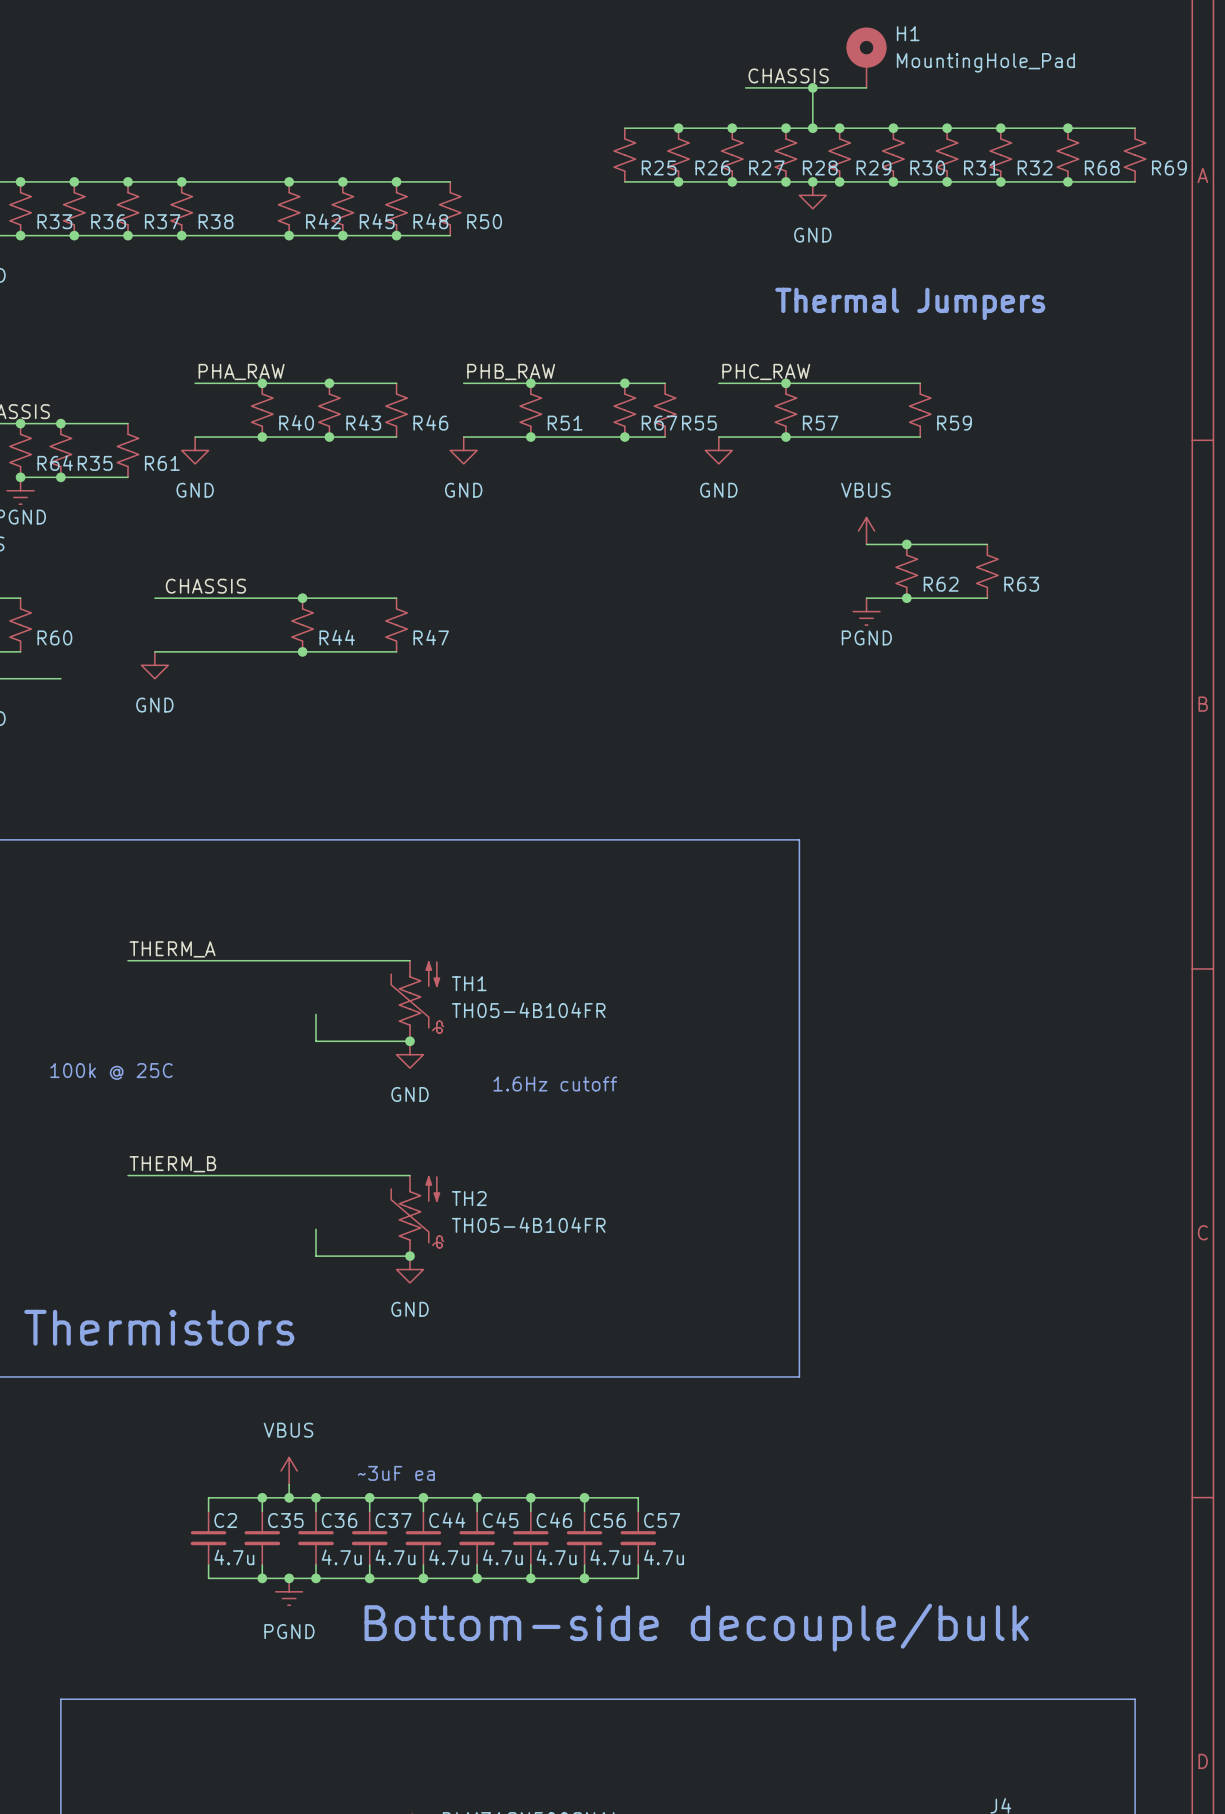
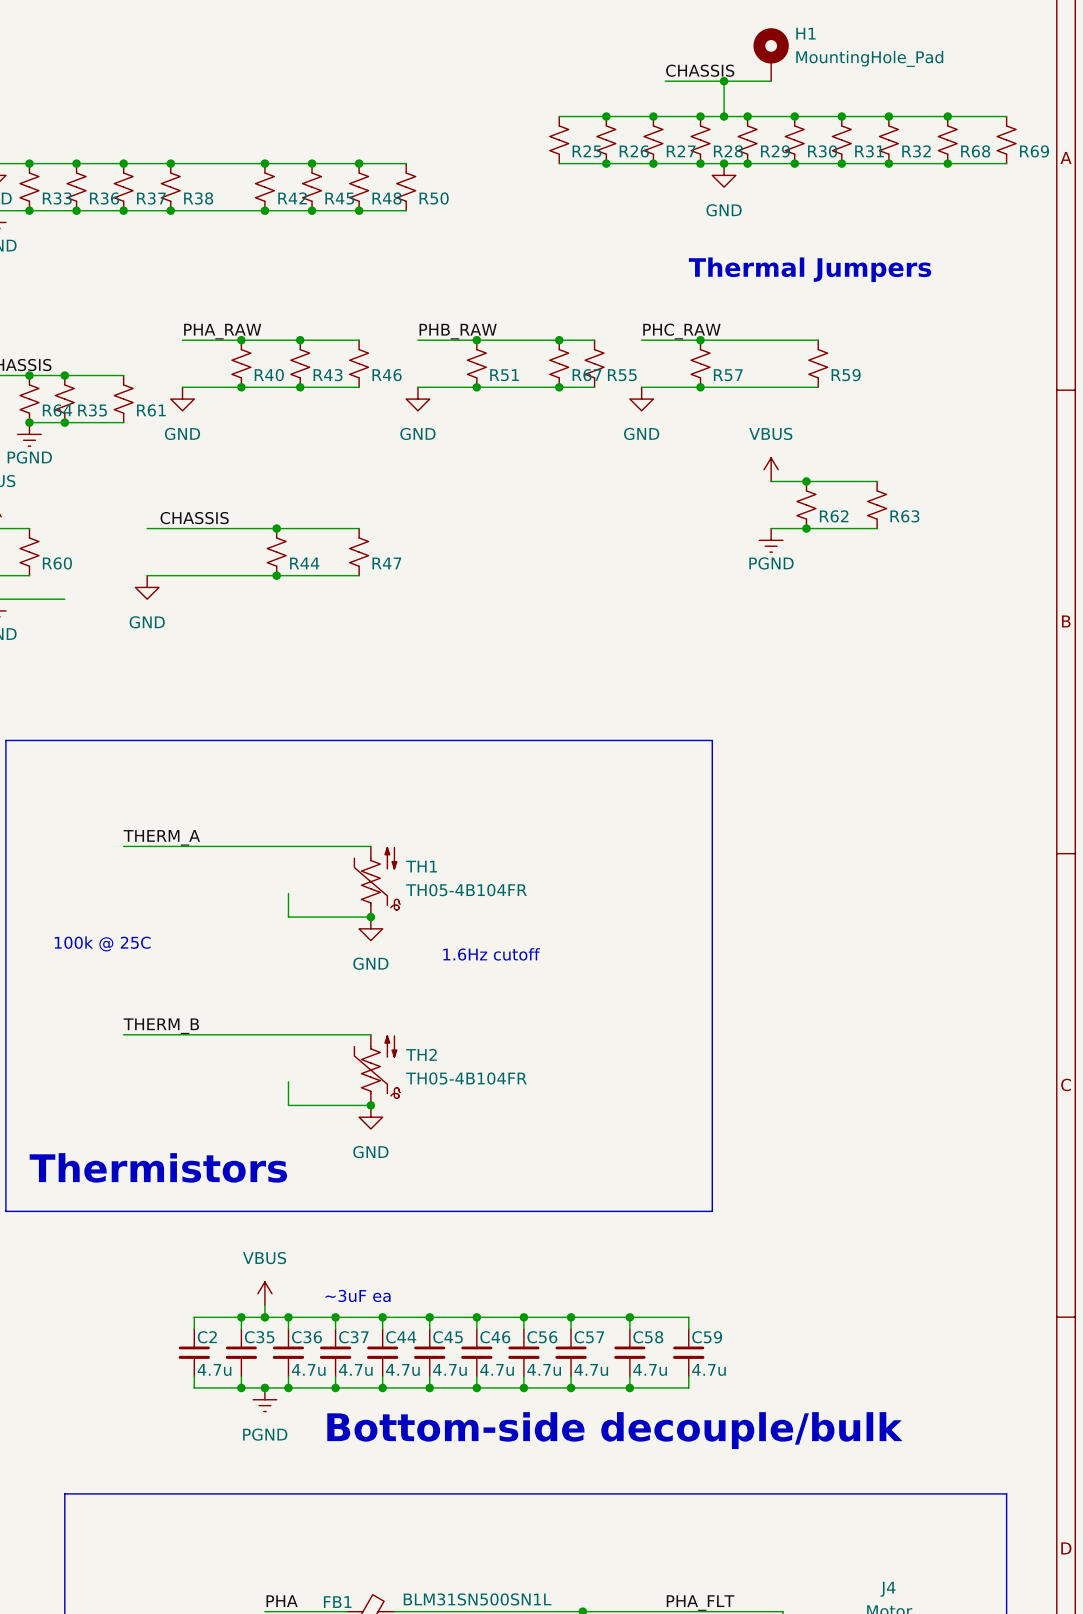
wire: none -> (571, 1317) (688, 1317) (688, 1329)
junction: none -> (571, 1317)
wire: none -> (629, 1317) (629, 1329)
junction: none -> (629, 1317)
C58: none -> 4.7u (629, 1352)
C59: none -> 4.7u (688, 1352)
wire: none -> (629, 1376) (629, 1387)
wire: none -> (688, 1376) (688, 1387) (571, 1387)
junction: none -> (571, 1387)
junction: none -> (629, 1387)

